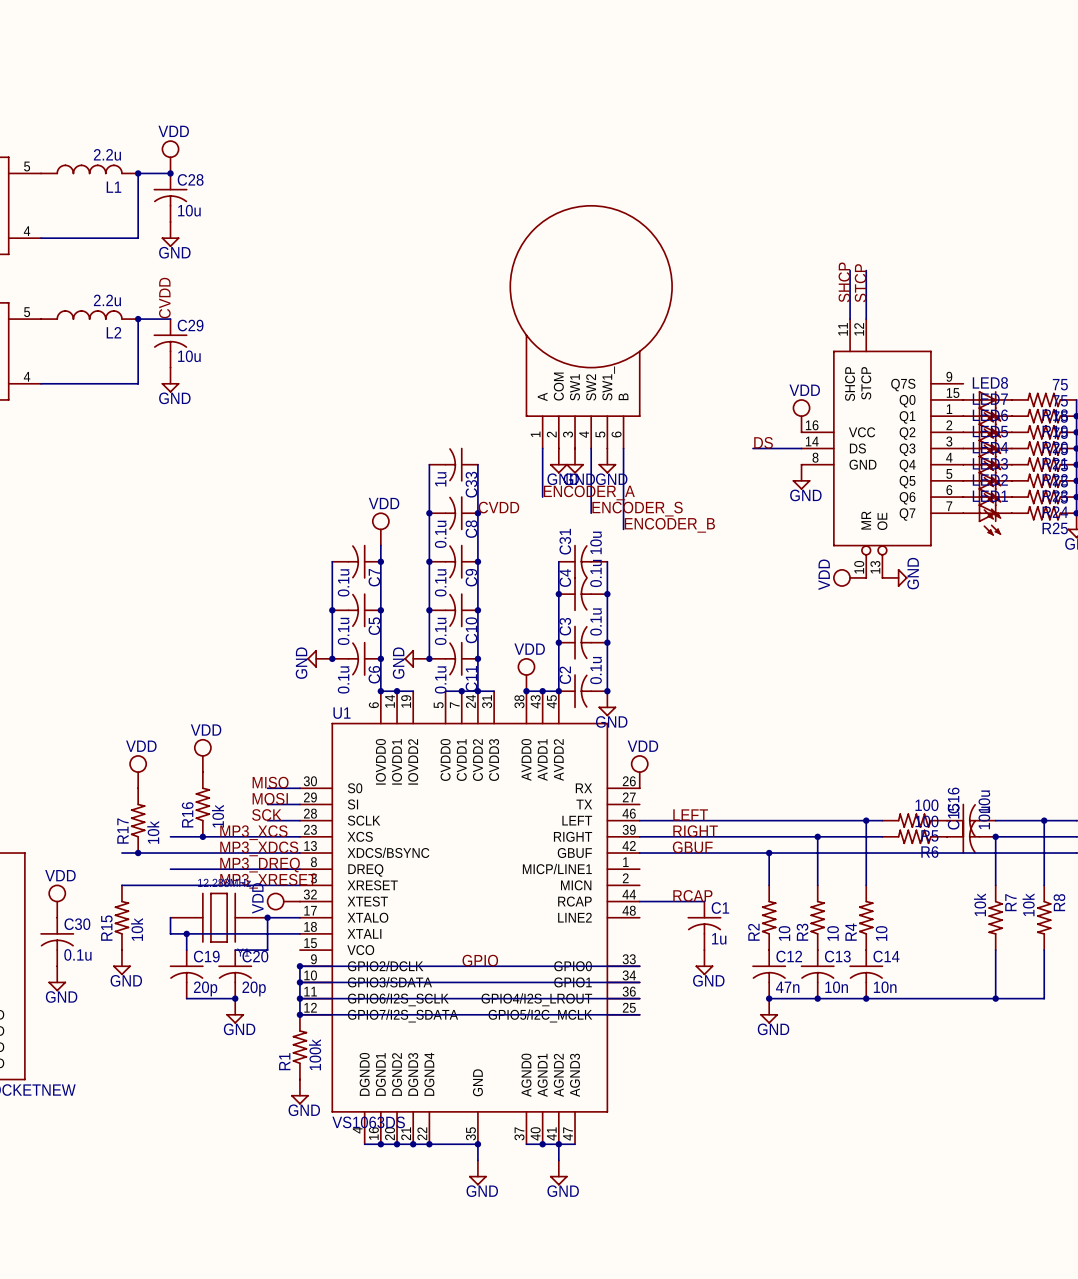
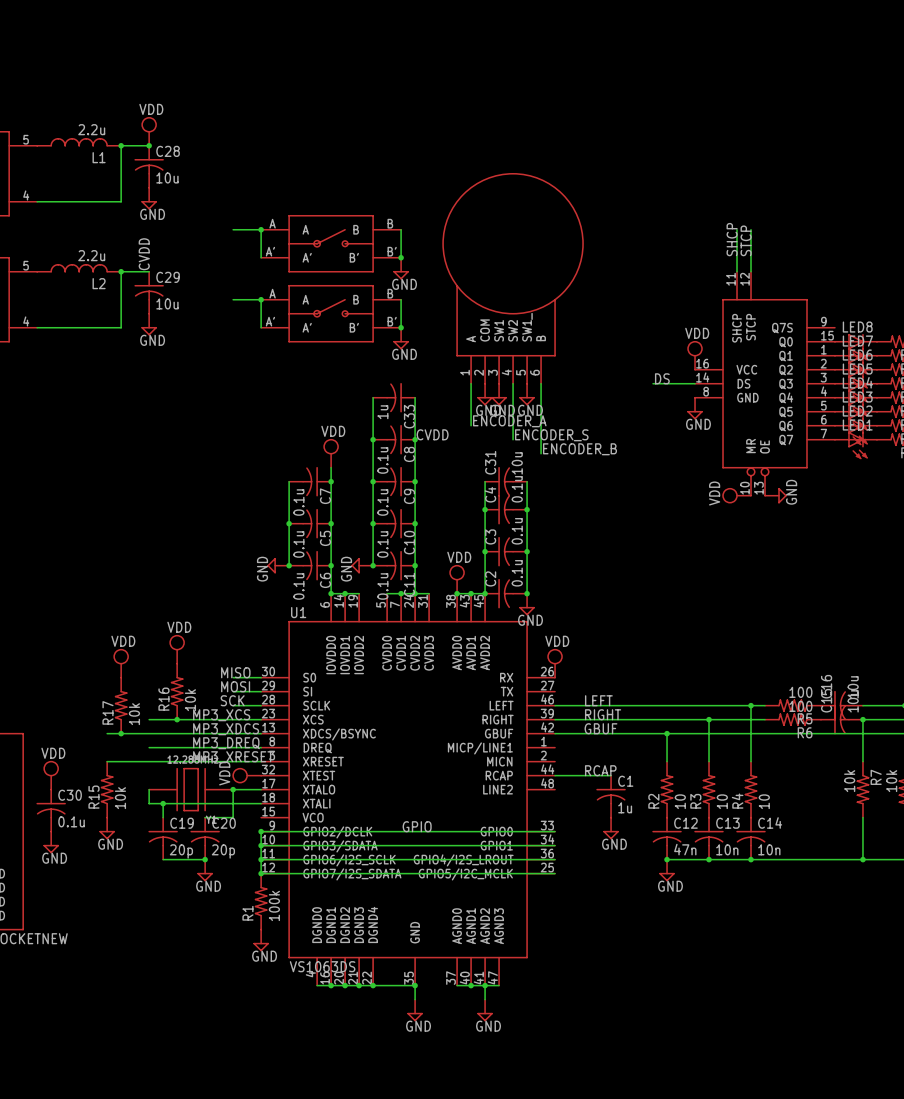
wire: none -> (233, 229) (261, 229) (261, 257)
junction: none -> (261, 229)
wire: none -> (401, 229) (401, 257)
part: none -> (331, 243)
junction: none -> (401, 257)
power symbol: none -> GND (401, 268)
wire: none -> (233, 299) (261, 299) (261, 327)
junction: none -> (261, 299)
wire: none -> (401, 299) (401, 327)
part: none -> (331, 313)
junction: none -> (401, 327)
power symbol: none -> GND (401, 338)

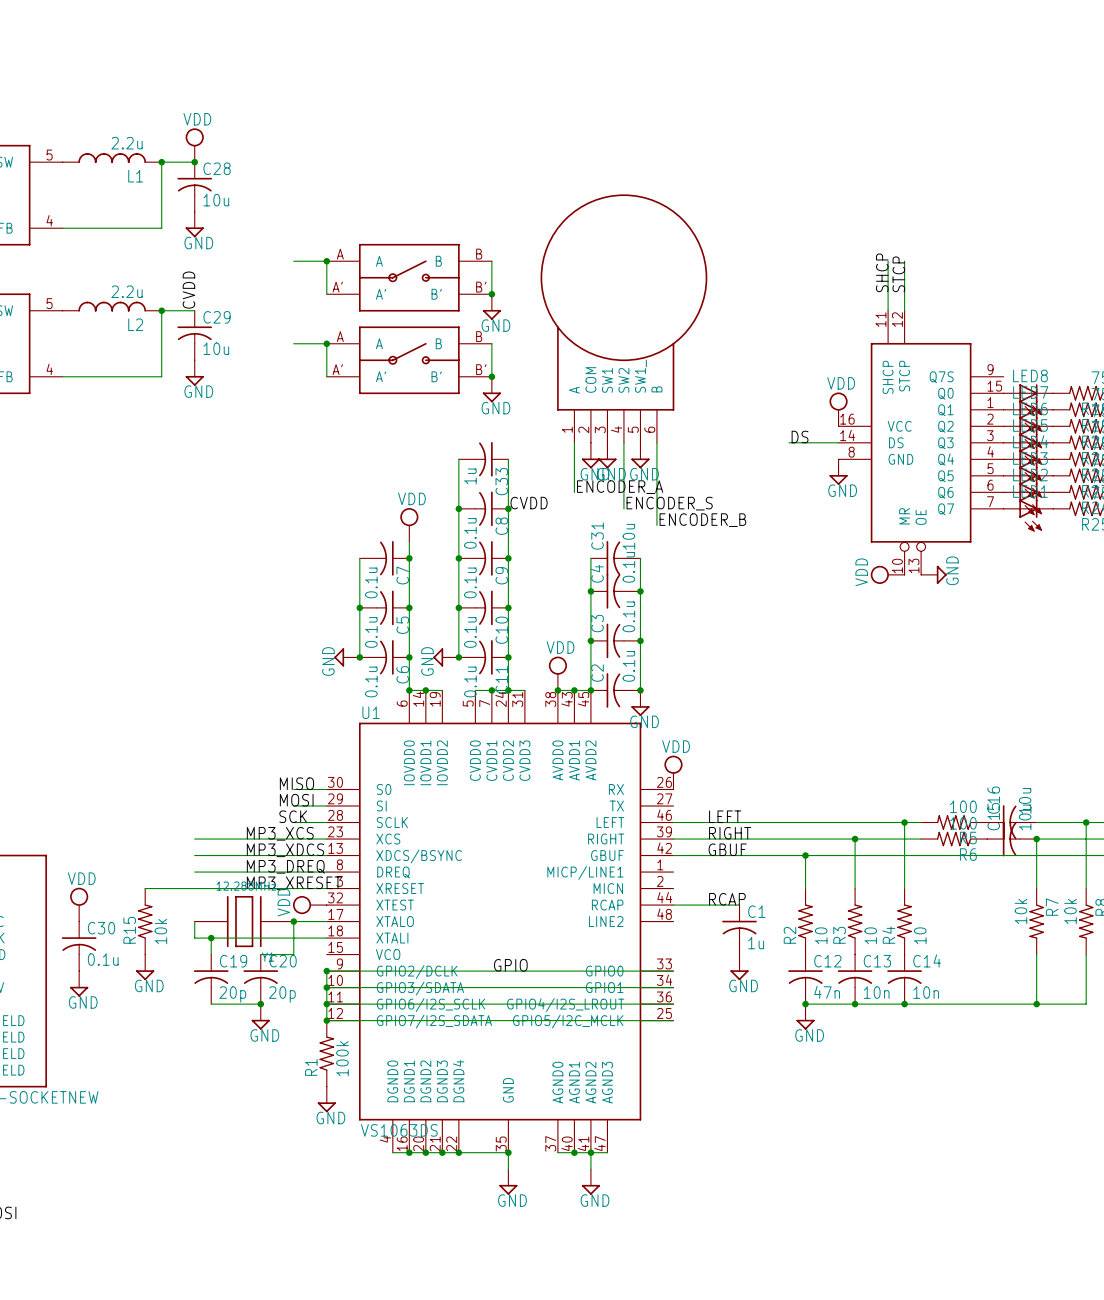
power symbol: VDD (177, 649) -> none
power symbol: VDD (121, 663) -> none
R16: 10k (177, 691) -> none
R17: 10k (121, 705) -> none
junction: (177, 719) -> none
wire: (107, 733) (149, 733) -> none
junction: (121, 733) -> none

